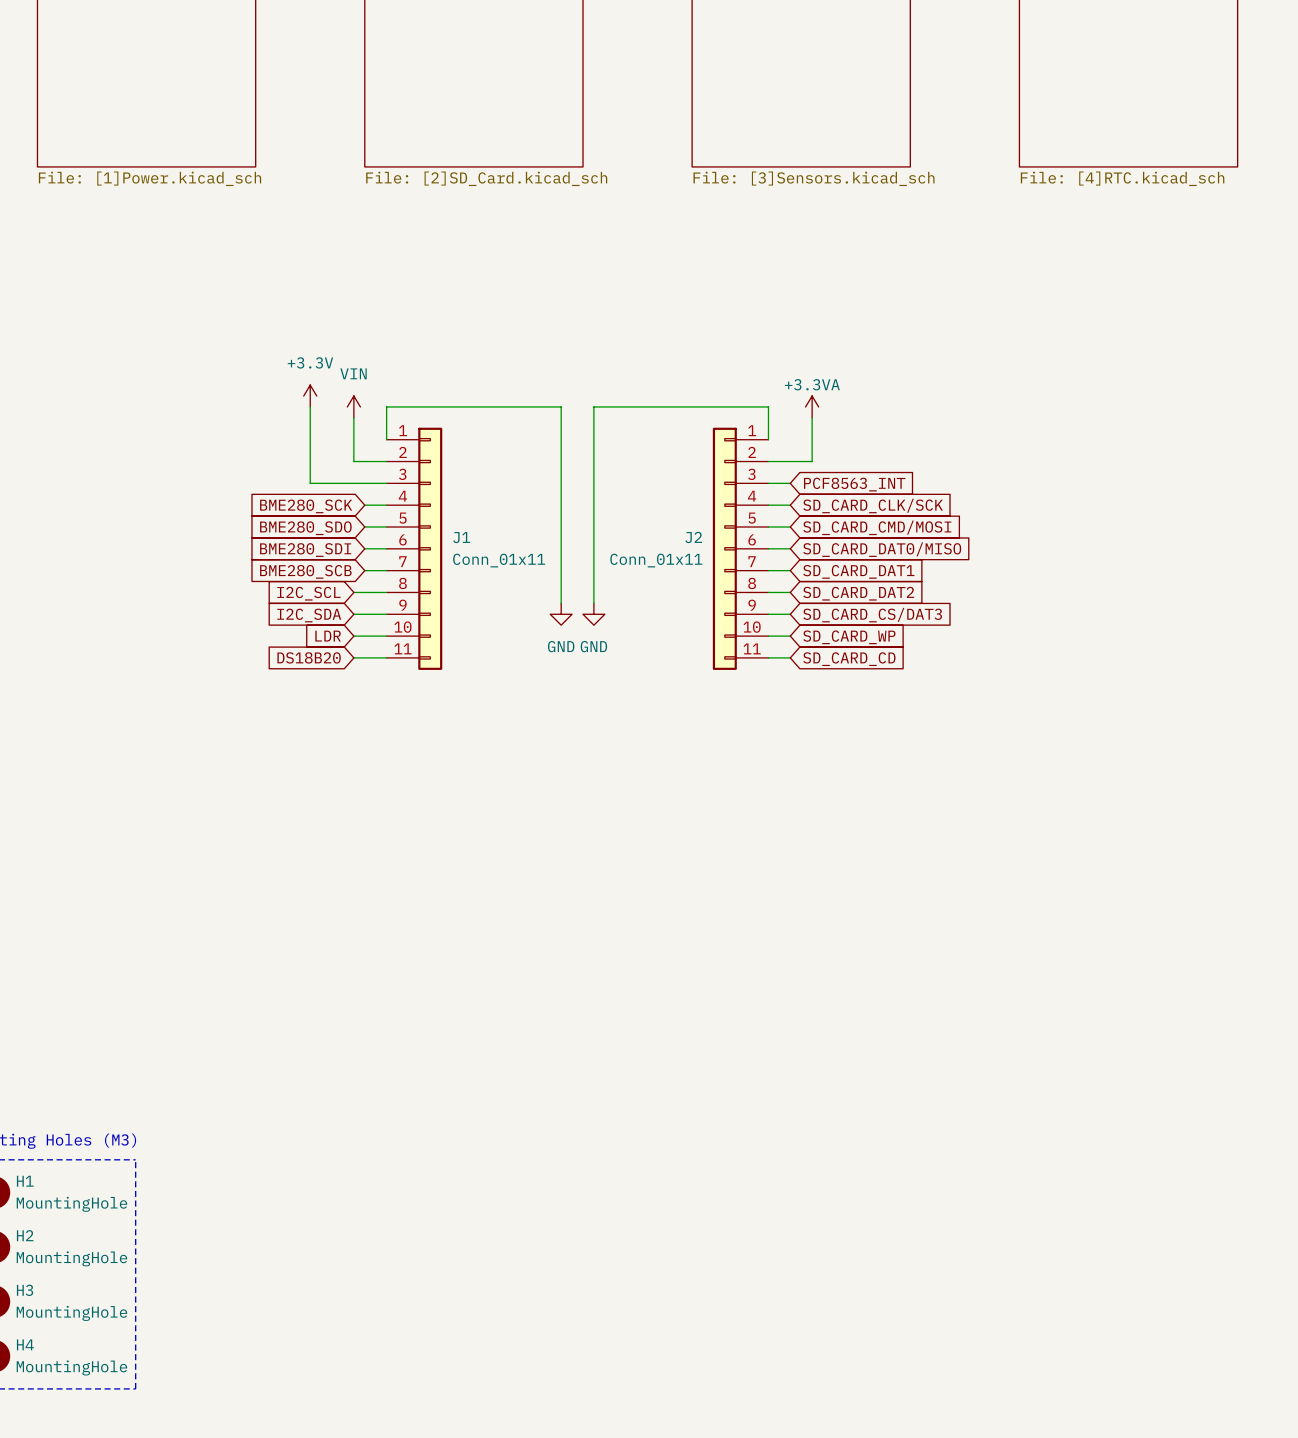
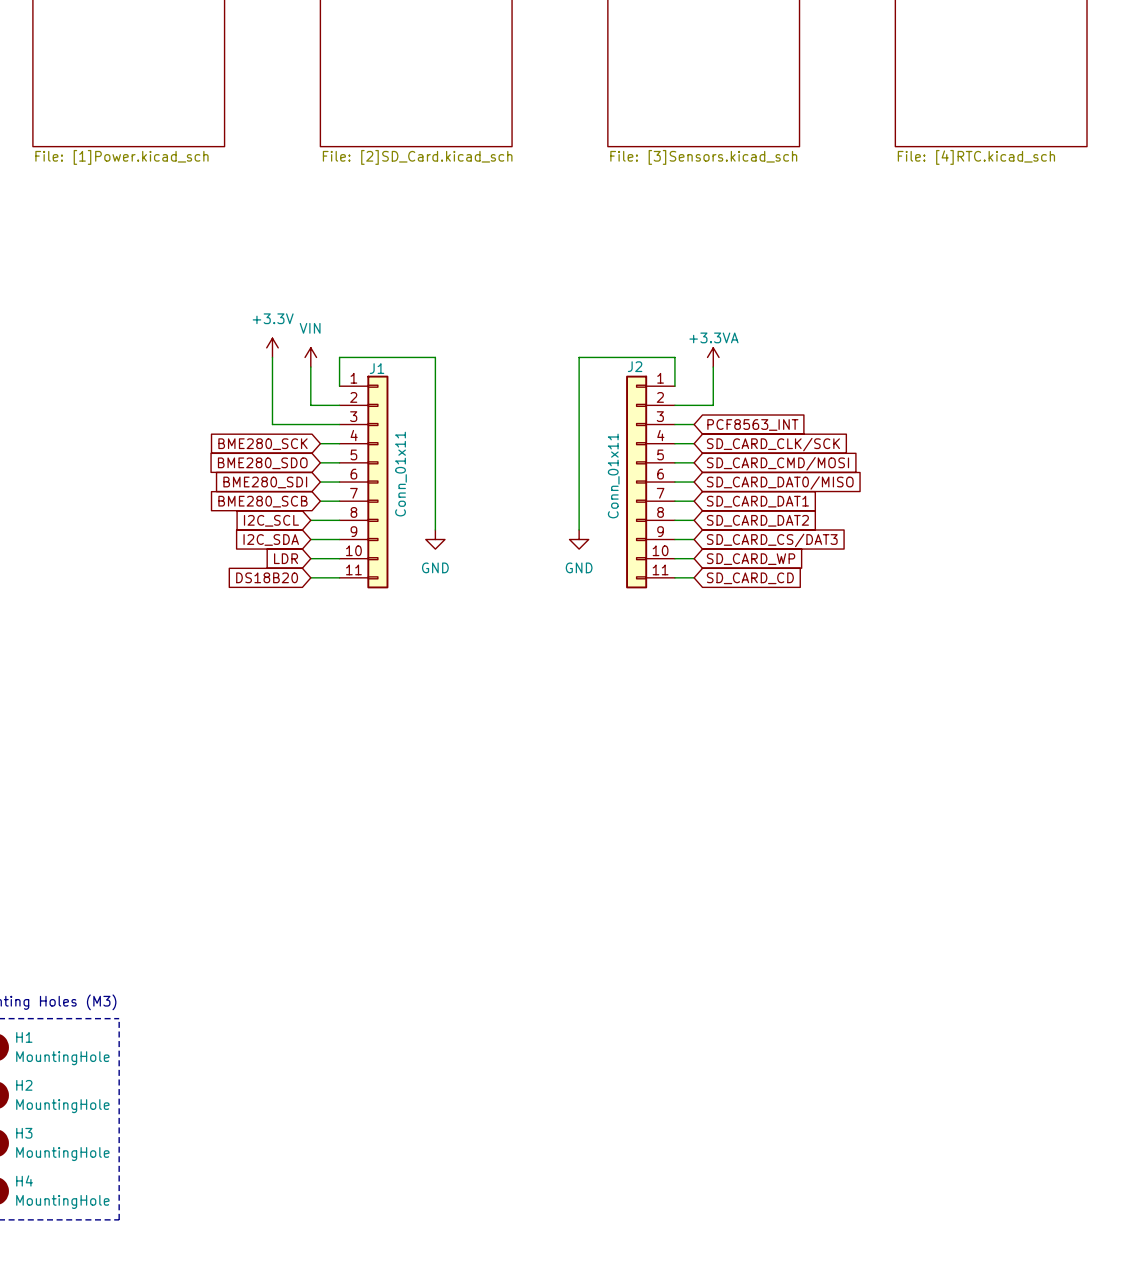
wire: (495, 406) (561, 406) (561, 603) -> (435, 357) (435, 529)
wire: (659, 406) (593, 406) (593, 603) -> (579, 357) (579, 529)
J1 name position: J1 (461, 537) -> J1 (377, 368)
J2 name position: J2 (693, 537) -> J2 (635, 366)
J1 value rotation: 0° (499, 560) -> 90° counterclockwise (400, 474)
J2 value rotation: 0° (656, 560) -> 90° counterclockwise (613, 476)
power symbol: none -> GND (435, 539)
power symbol: GND (561, 614) -> none
power symbol: GND (593, 614) -> none
power symbol: none -> GND (579, 539)

